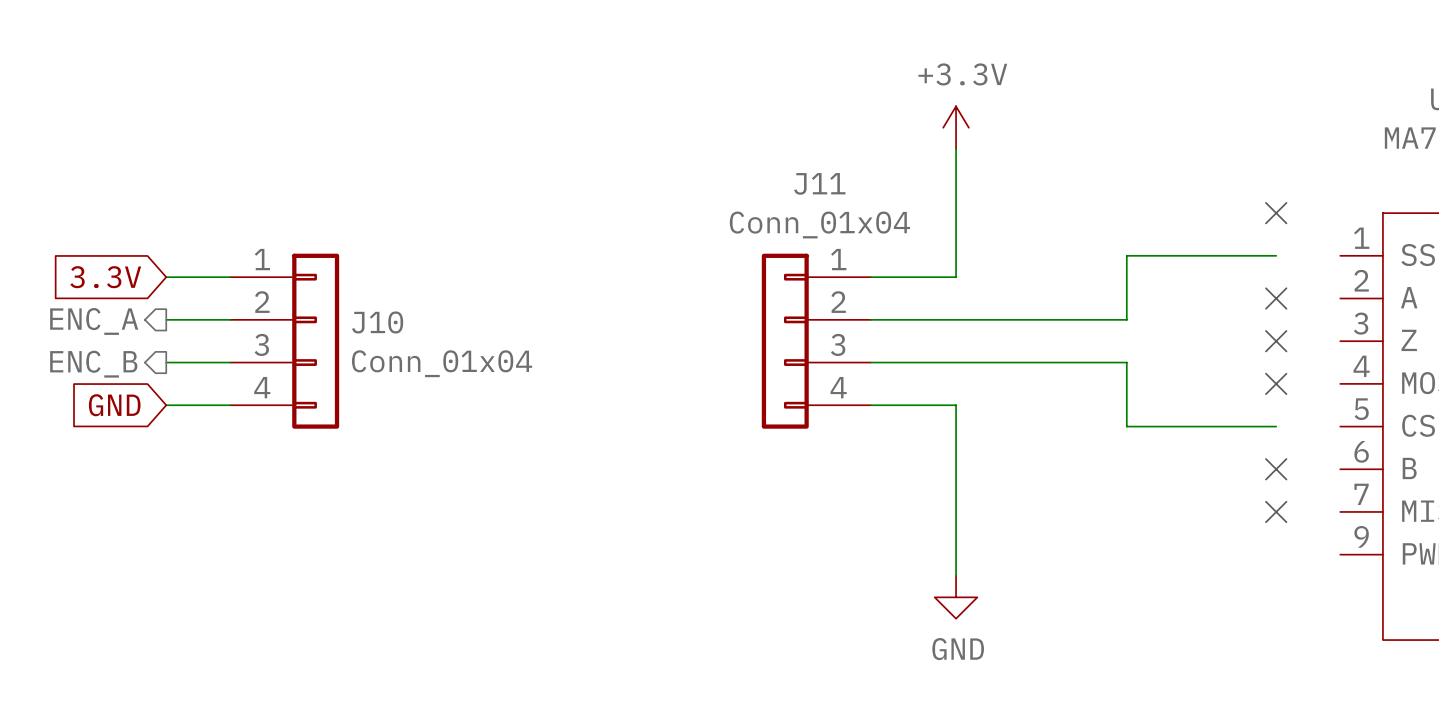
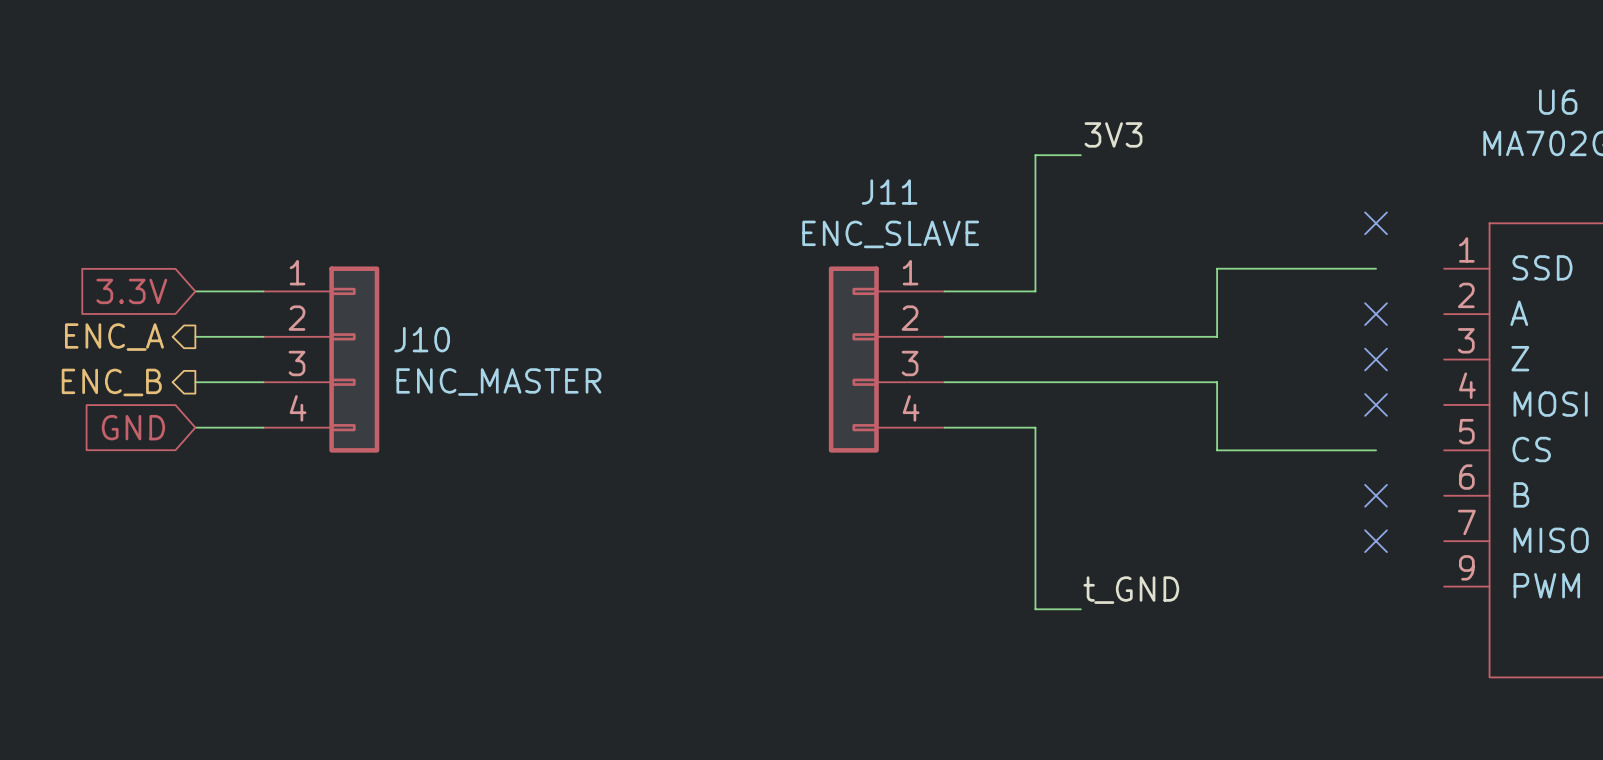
power symbol: +3.3V (956, 127) -> none
label: none -> 3V3 (1113, 134)
wire: none -> (1035, 155) (1080, 155)
J11 value: Conn_01x04 (819, 224) -> ENC_SLAVE (890, 234)
J10 value: Conn_01x04 (442, 363) -> ENC_MASTER (498, 382)
label: none -> t_GND (1131, 590)
wire: none -> (1035, 609) (1080, 609)
power symbol: GND (956, 597) -> none

